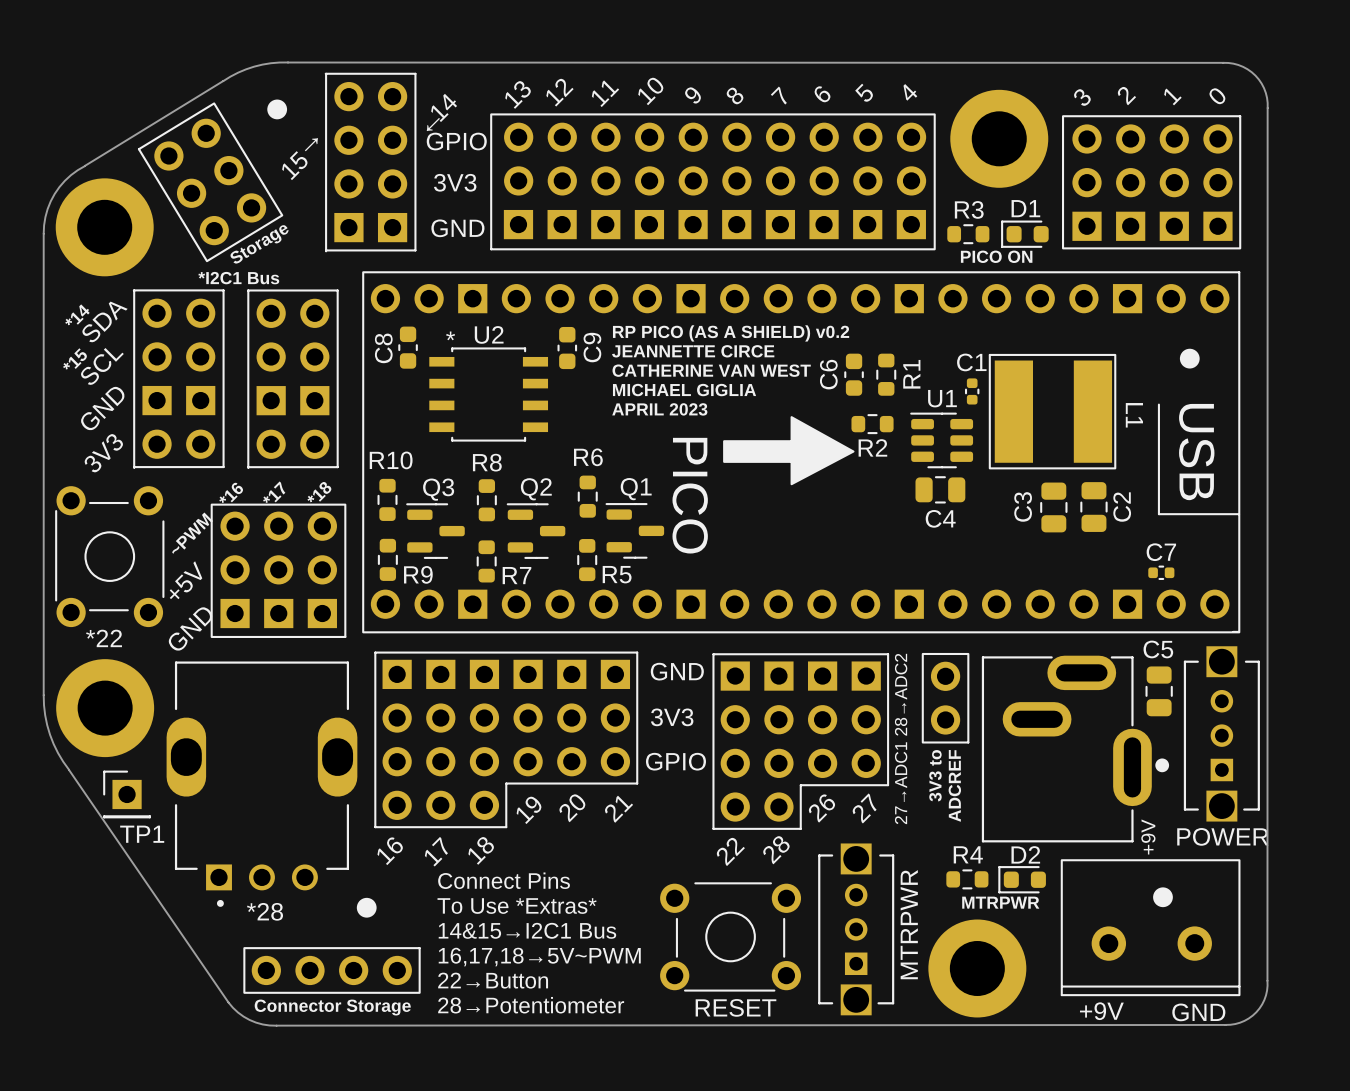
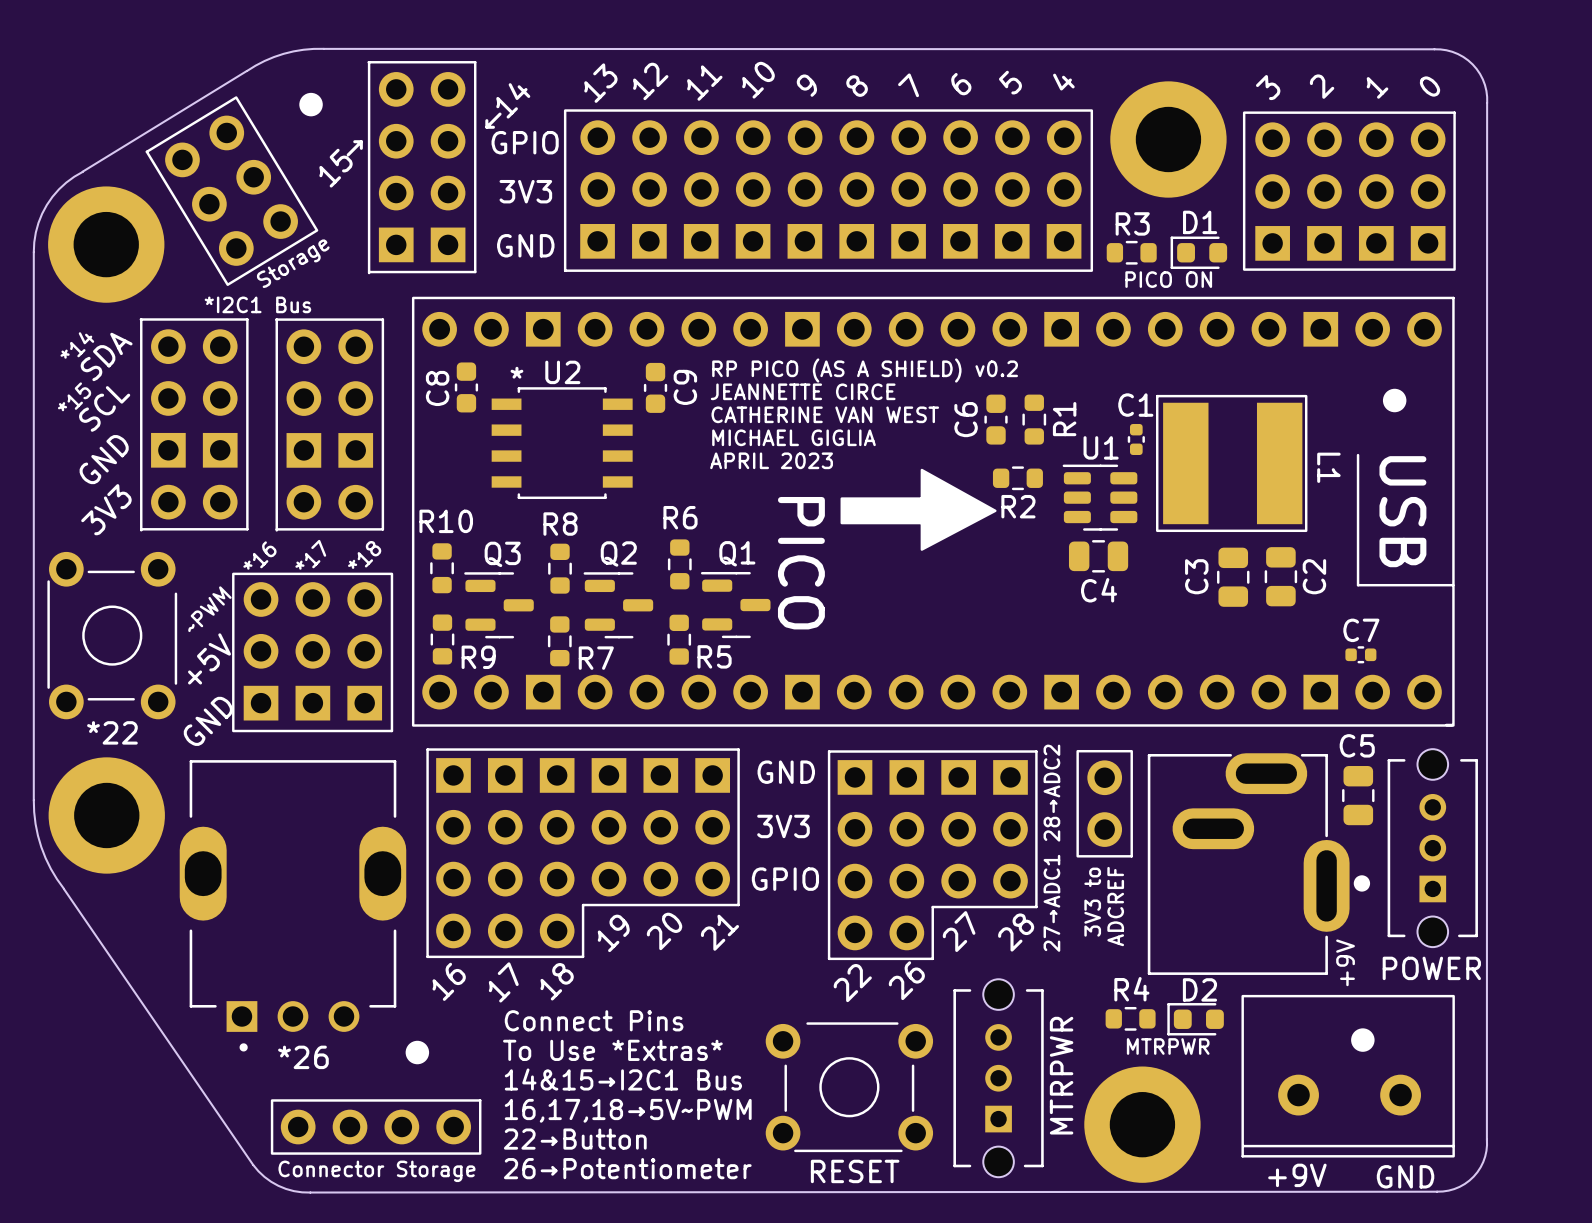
part footprint: [1183, 646, 1260, 822] -> [1387, 749, 1478, 948]
TP1: (127, 794) -> none
text: 26 (821, 807) -> 27 (959, 931)
text: 27 (864, 808) -> 28 (1016, 932)
part footprint: [818, 843, 895, 1016] -> [953, 979, 1044, 1178]
text: 28 (776, 850) -> 26 (906, 980)
text: *28 (265, 911) -> *26 (303, 1057)
text: 28→Potentiometer (531, 1005) -> 26→Potentiometer (627, 1168)

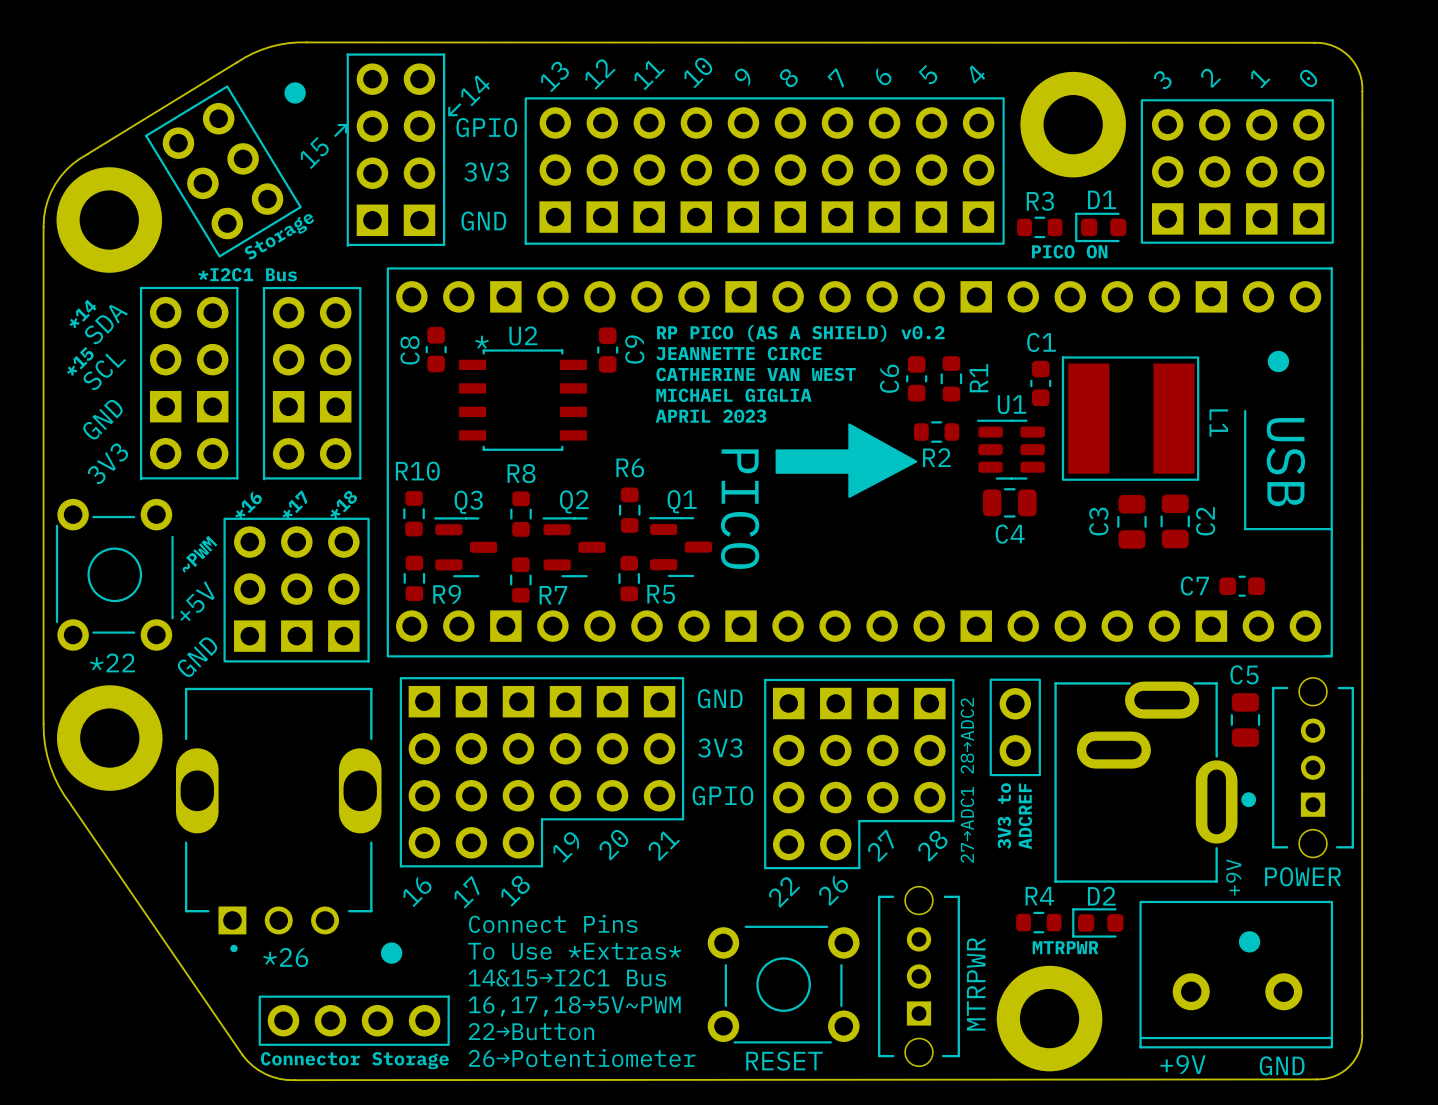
C1 footprint: [1127, 423, 1145, 455] -> [1030, 360, 1052, 407]
C7 name position: C7 (1361, 630) -> C7 (1194, 585)
C7 footprint: [1345, 646, 1377, 664] -> [1219, 575, 1265, 597]

